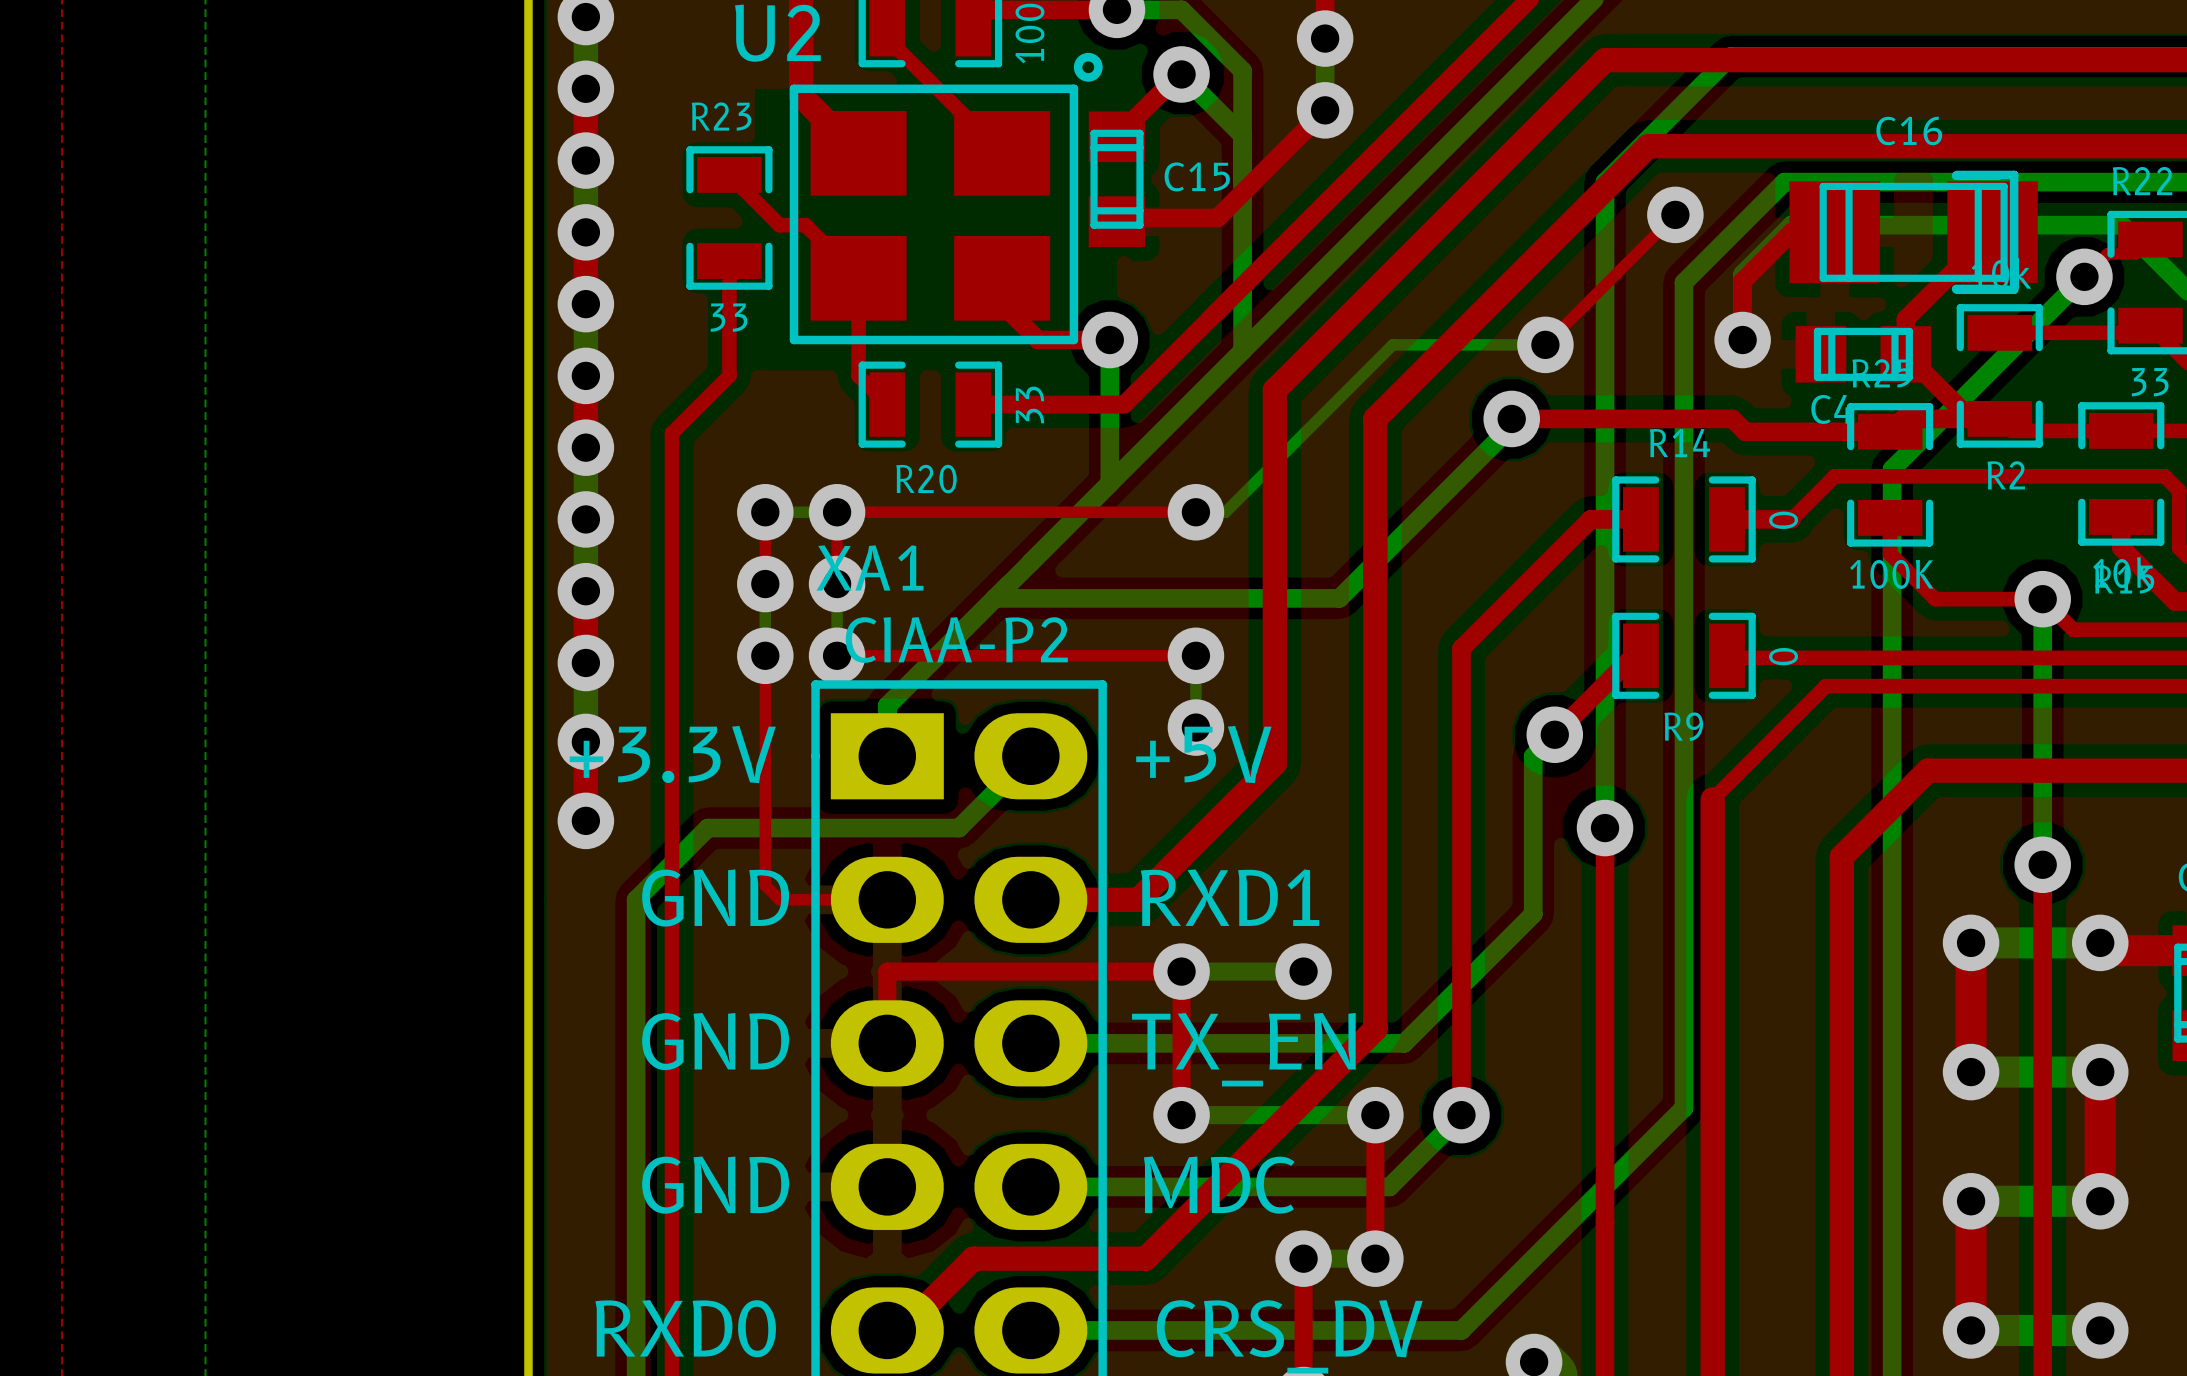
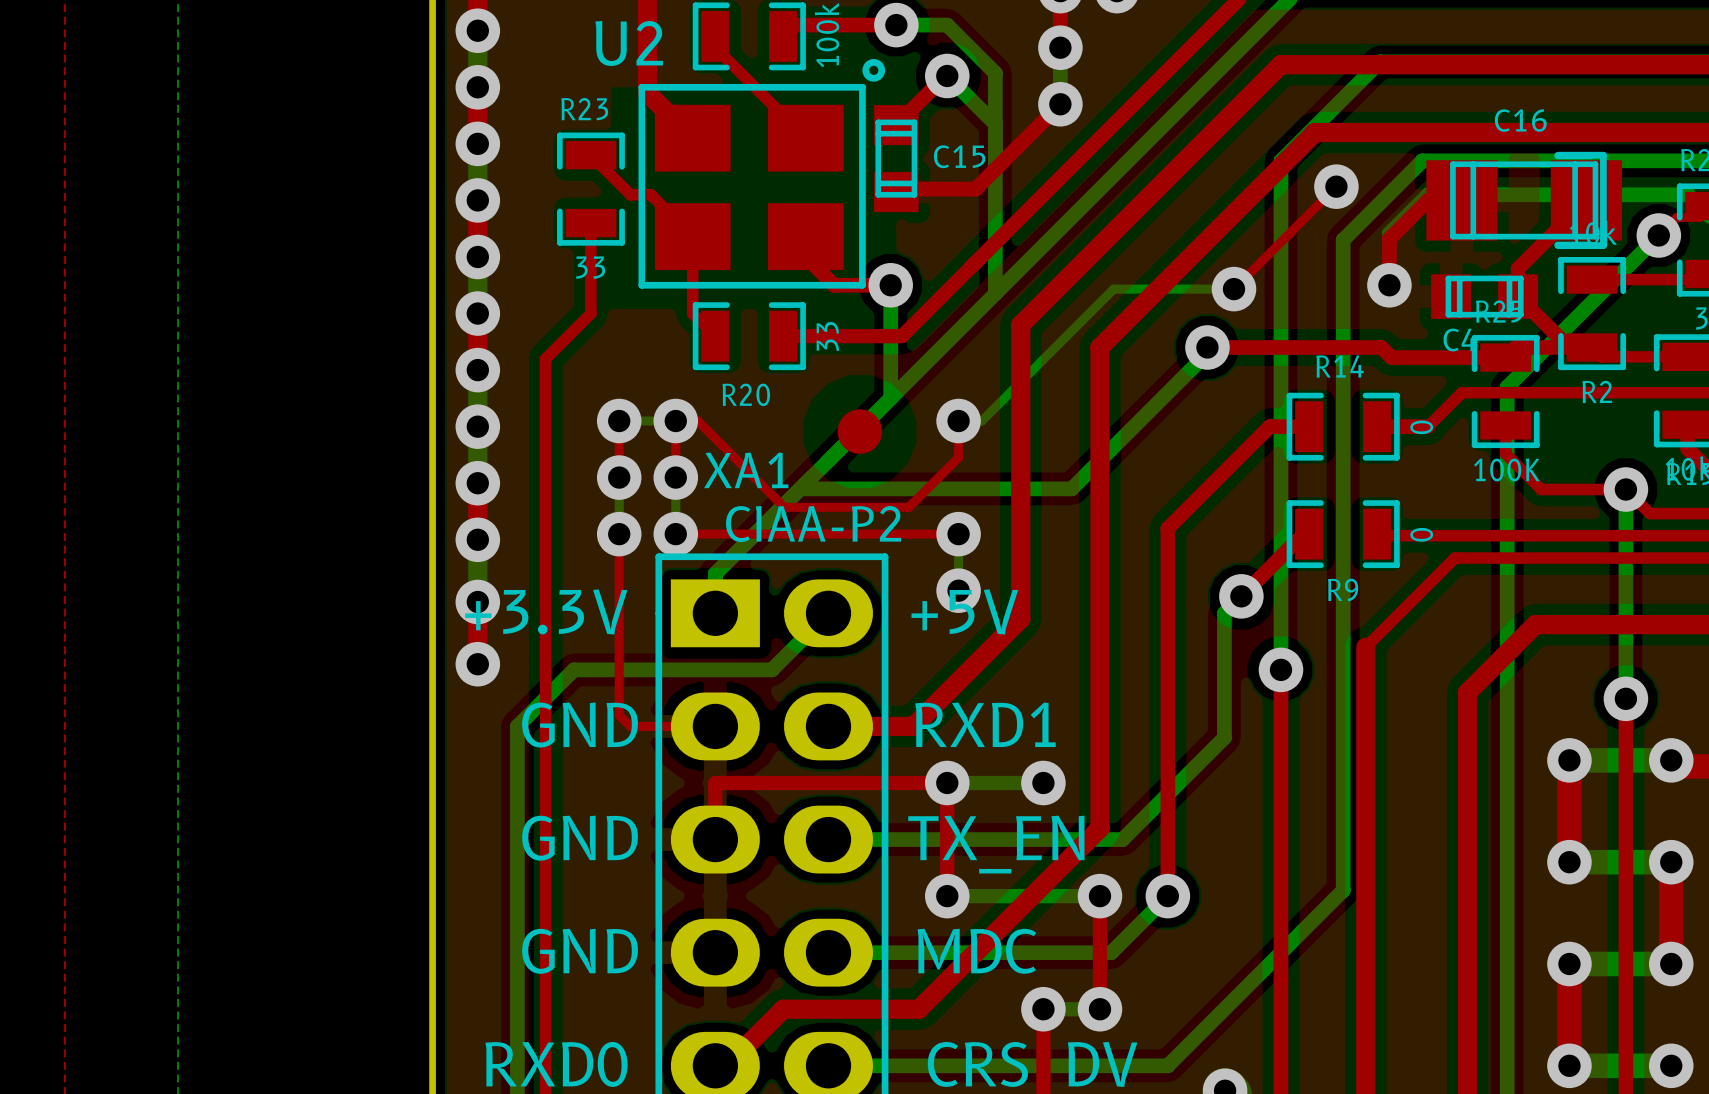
top track: (865, 512) (1195, 512) -> (697, 421) (784, 507) (908, 507) (958, 457) (958, 421)
part: none -> (859, 431)
XA1 name position: XA1 (870, 567) -> XA1 (746, 470)
XA1 text position: CIAA-P2 (956, 640) -> CIAA-P2 (813, 524)

